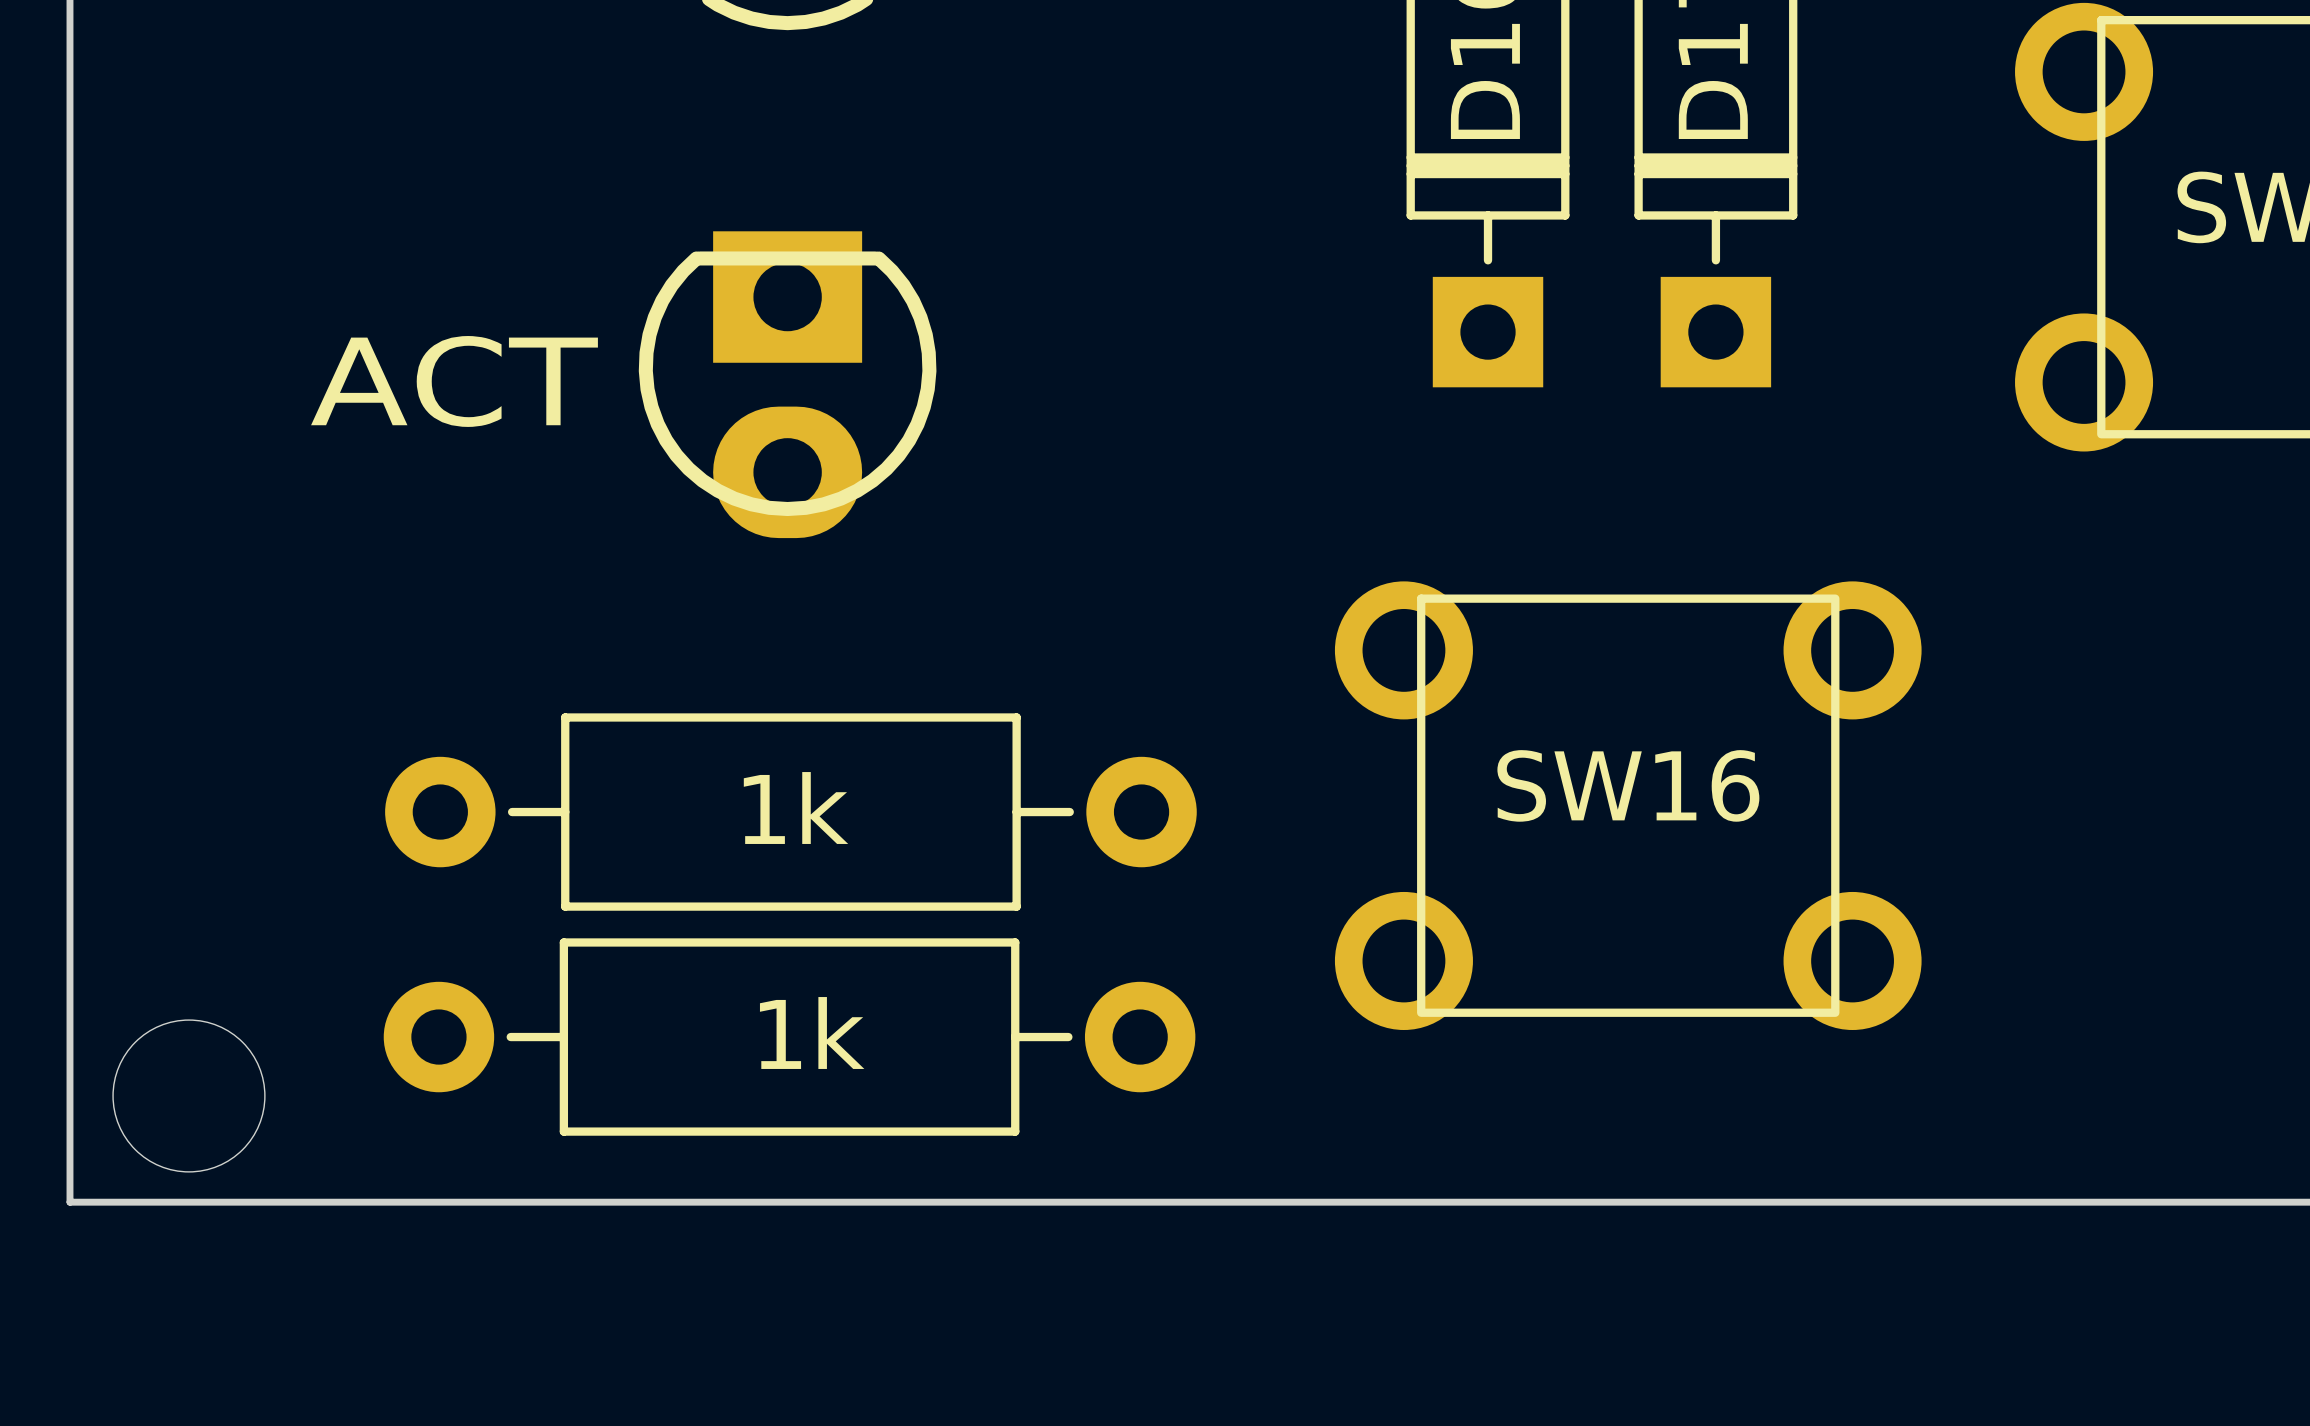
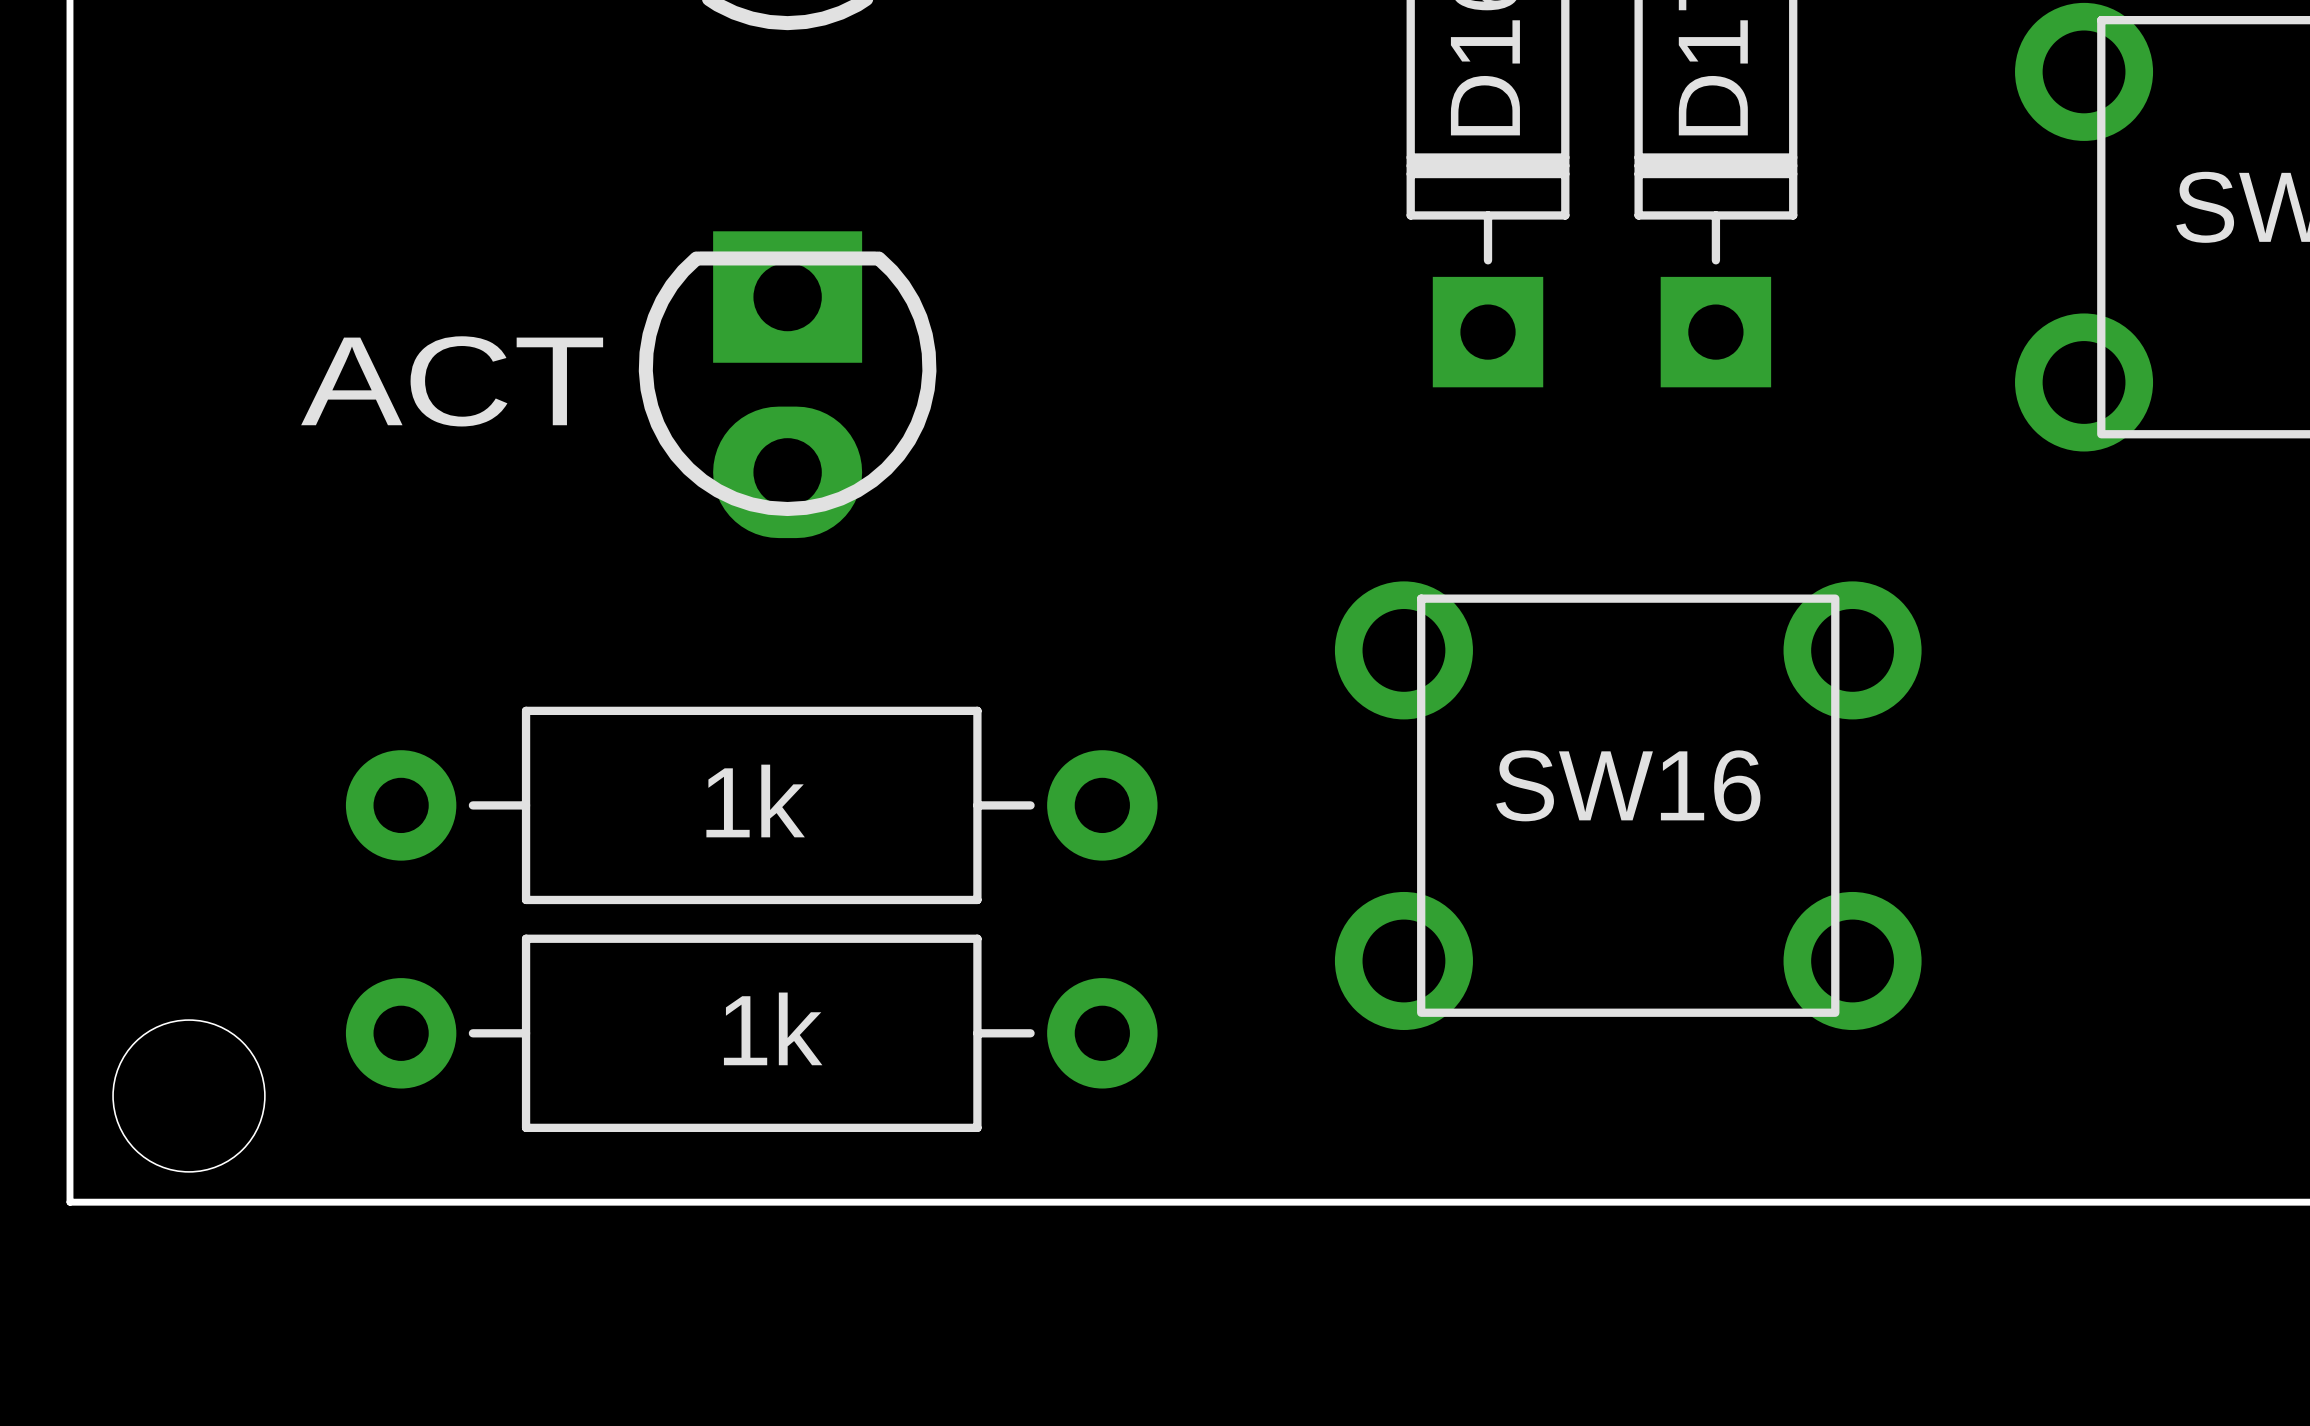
part position: (790, 812) -> (751, 805)
part position: (789, 1037) -> (751, 1033)

